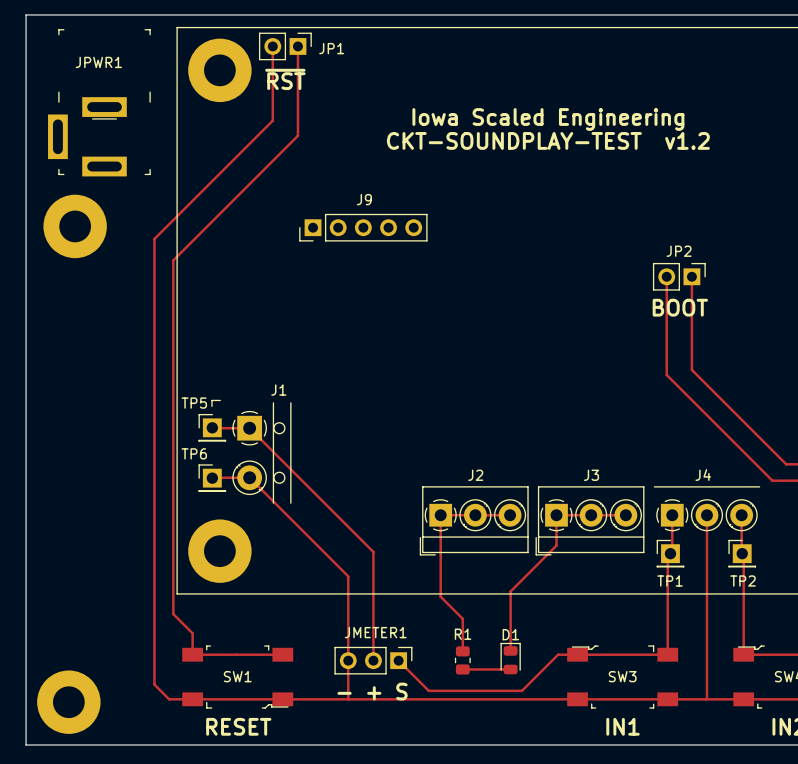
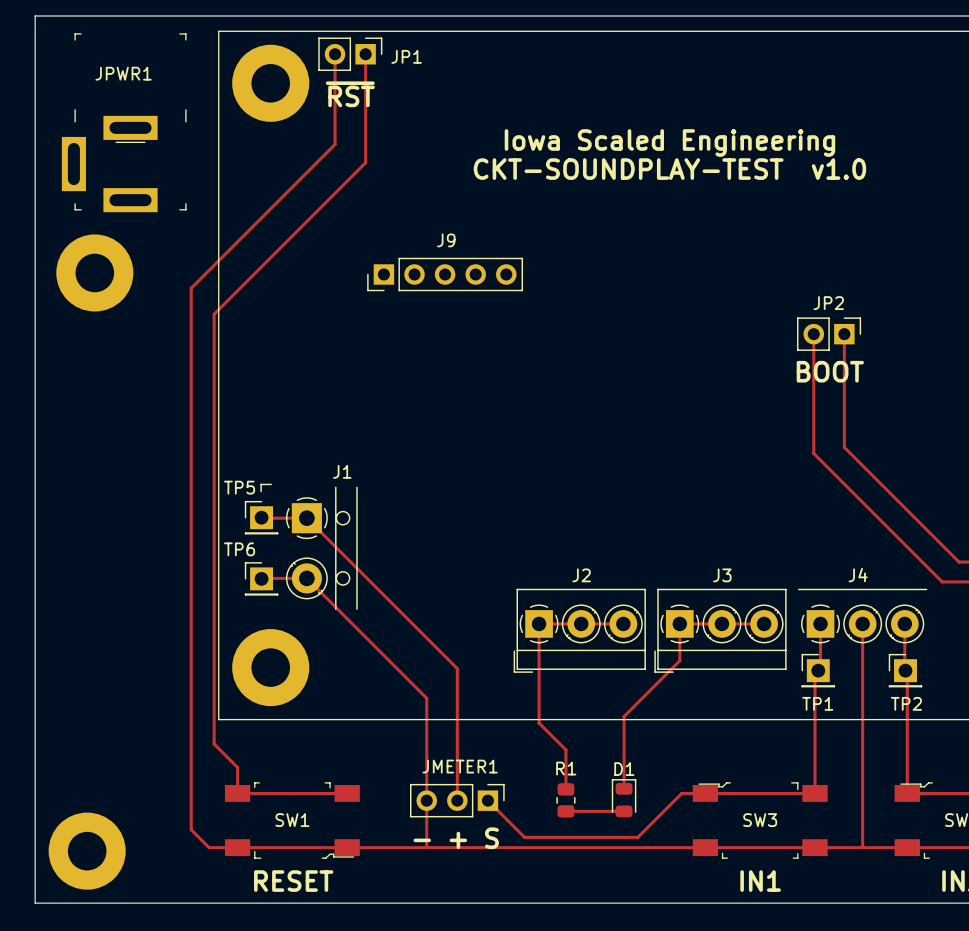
text: CKT-SOUNDPLAY-TEST v1.2 (548, 140) -> CKT-SOUNDPLAY-TEST v1.0 (669, 169)

